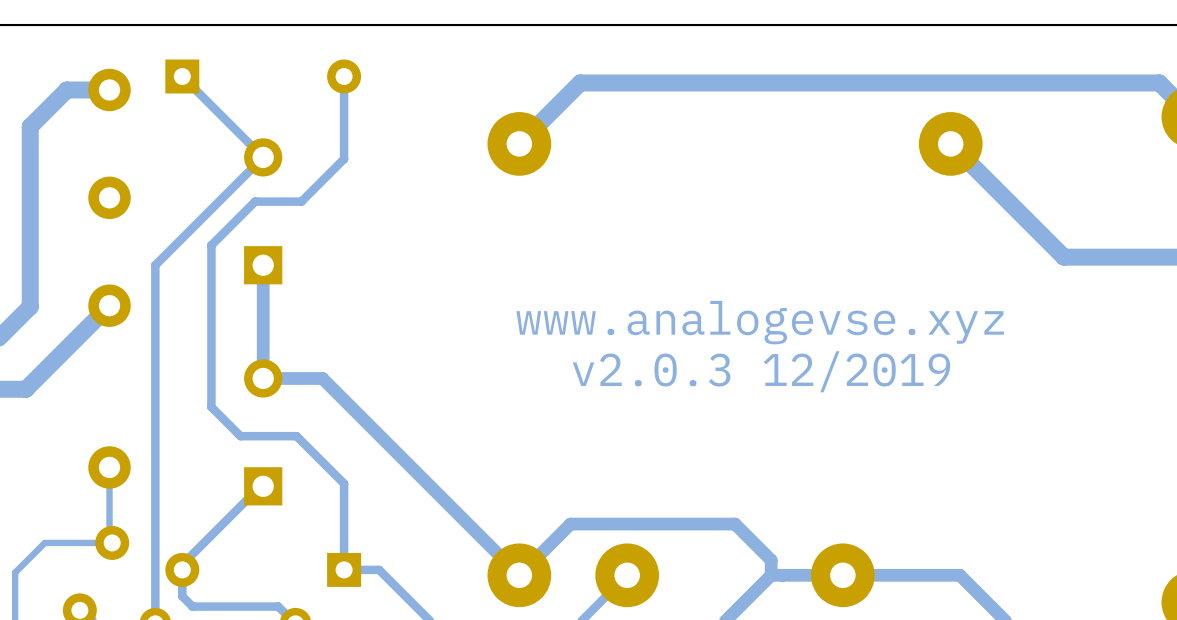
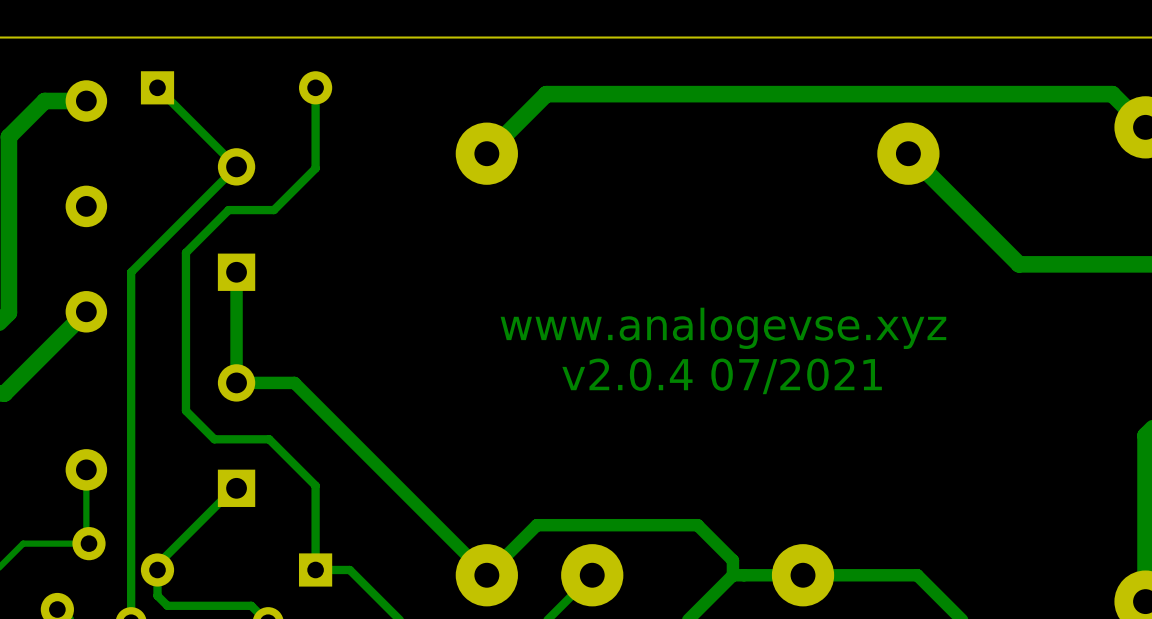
text: v2.0.3 12/2019 (761, 371) -> v2.0.4 07/2021 (722, 376)

